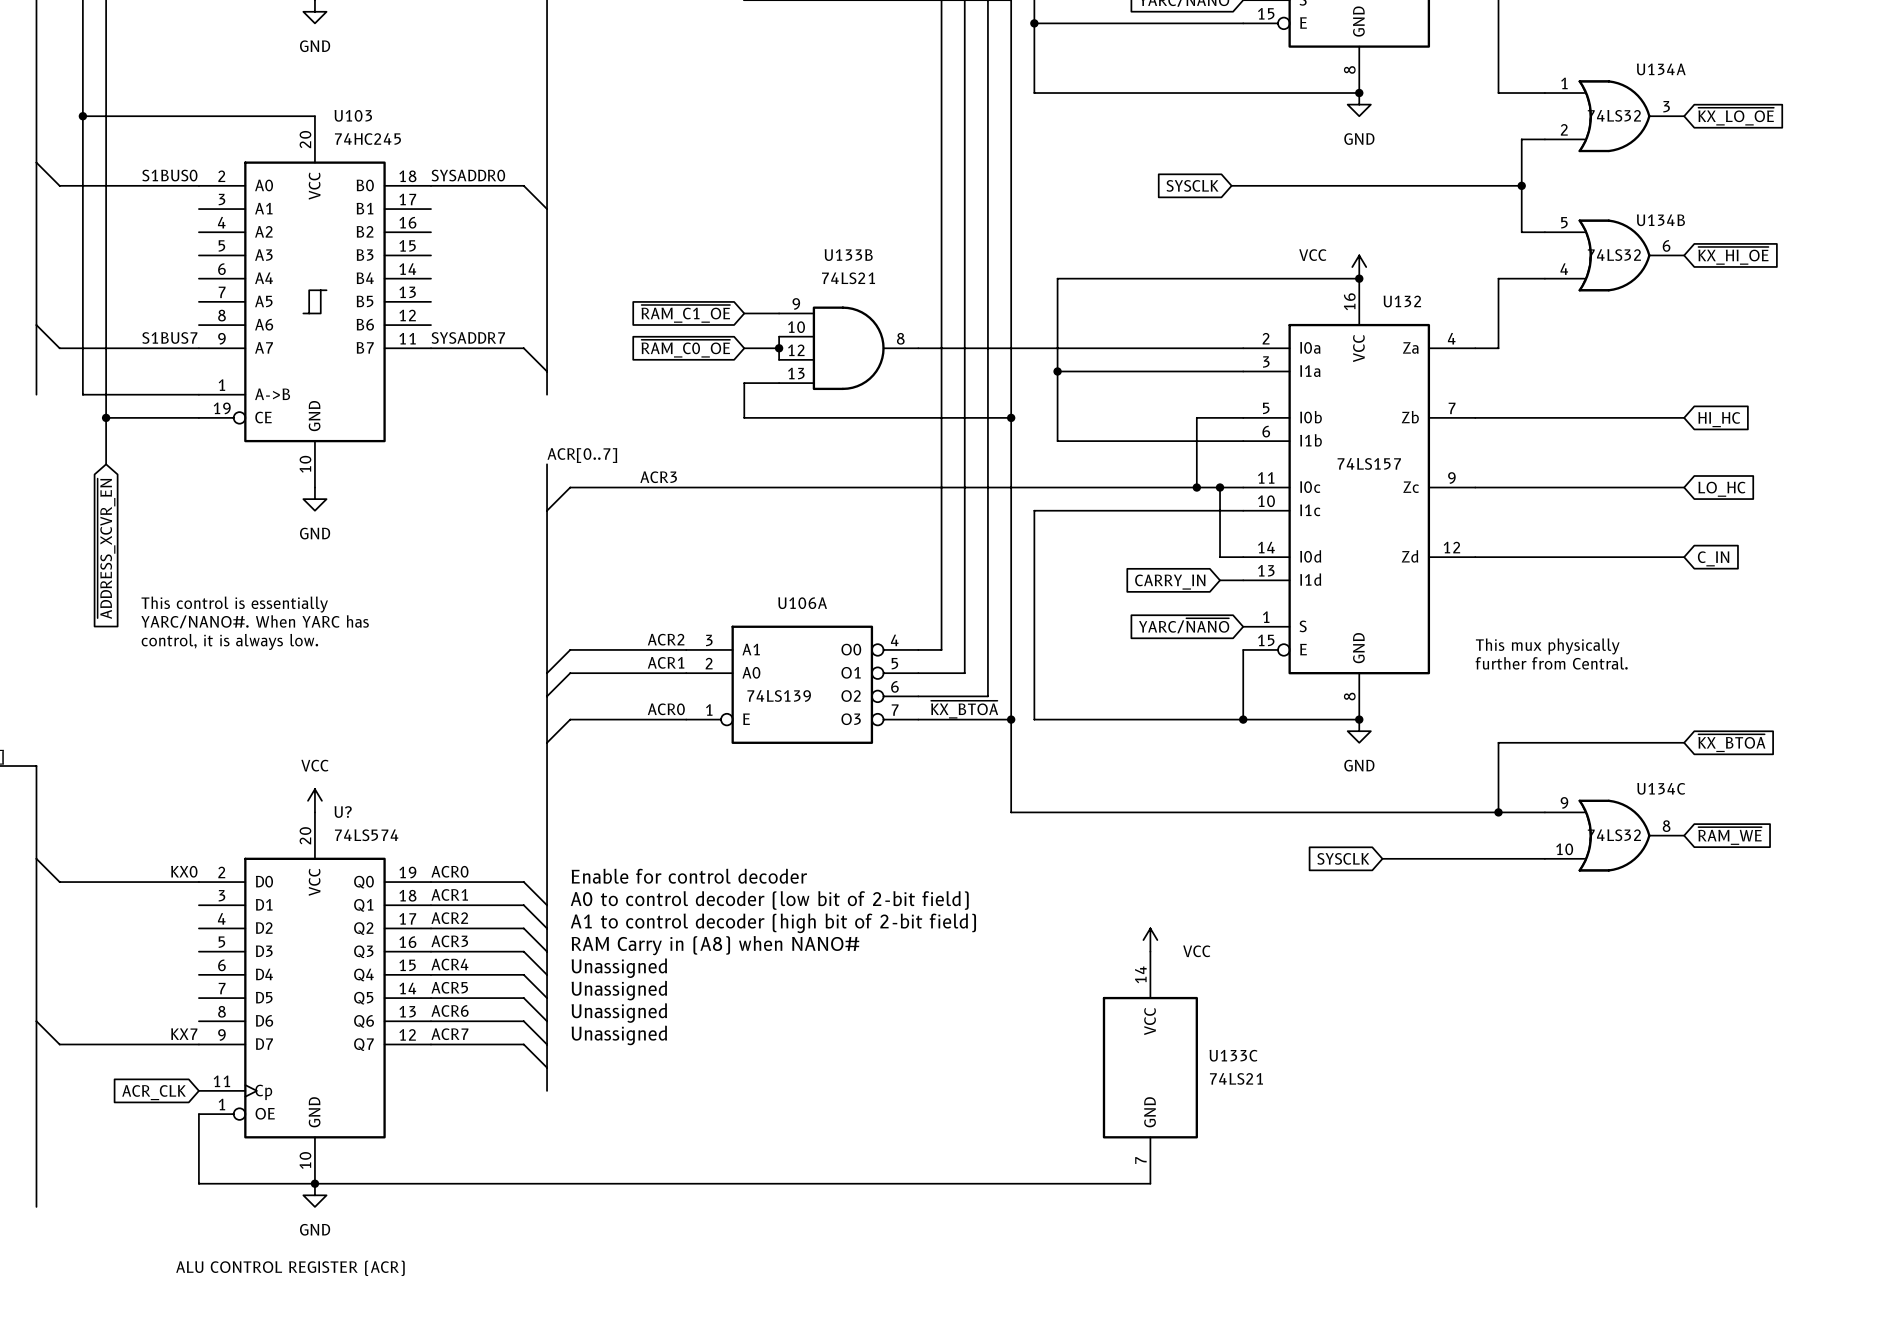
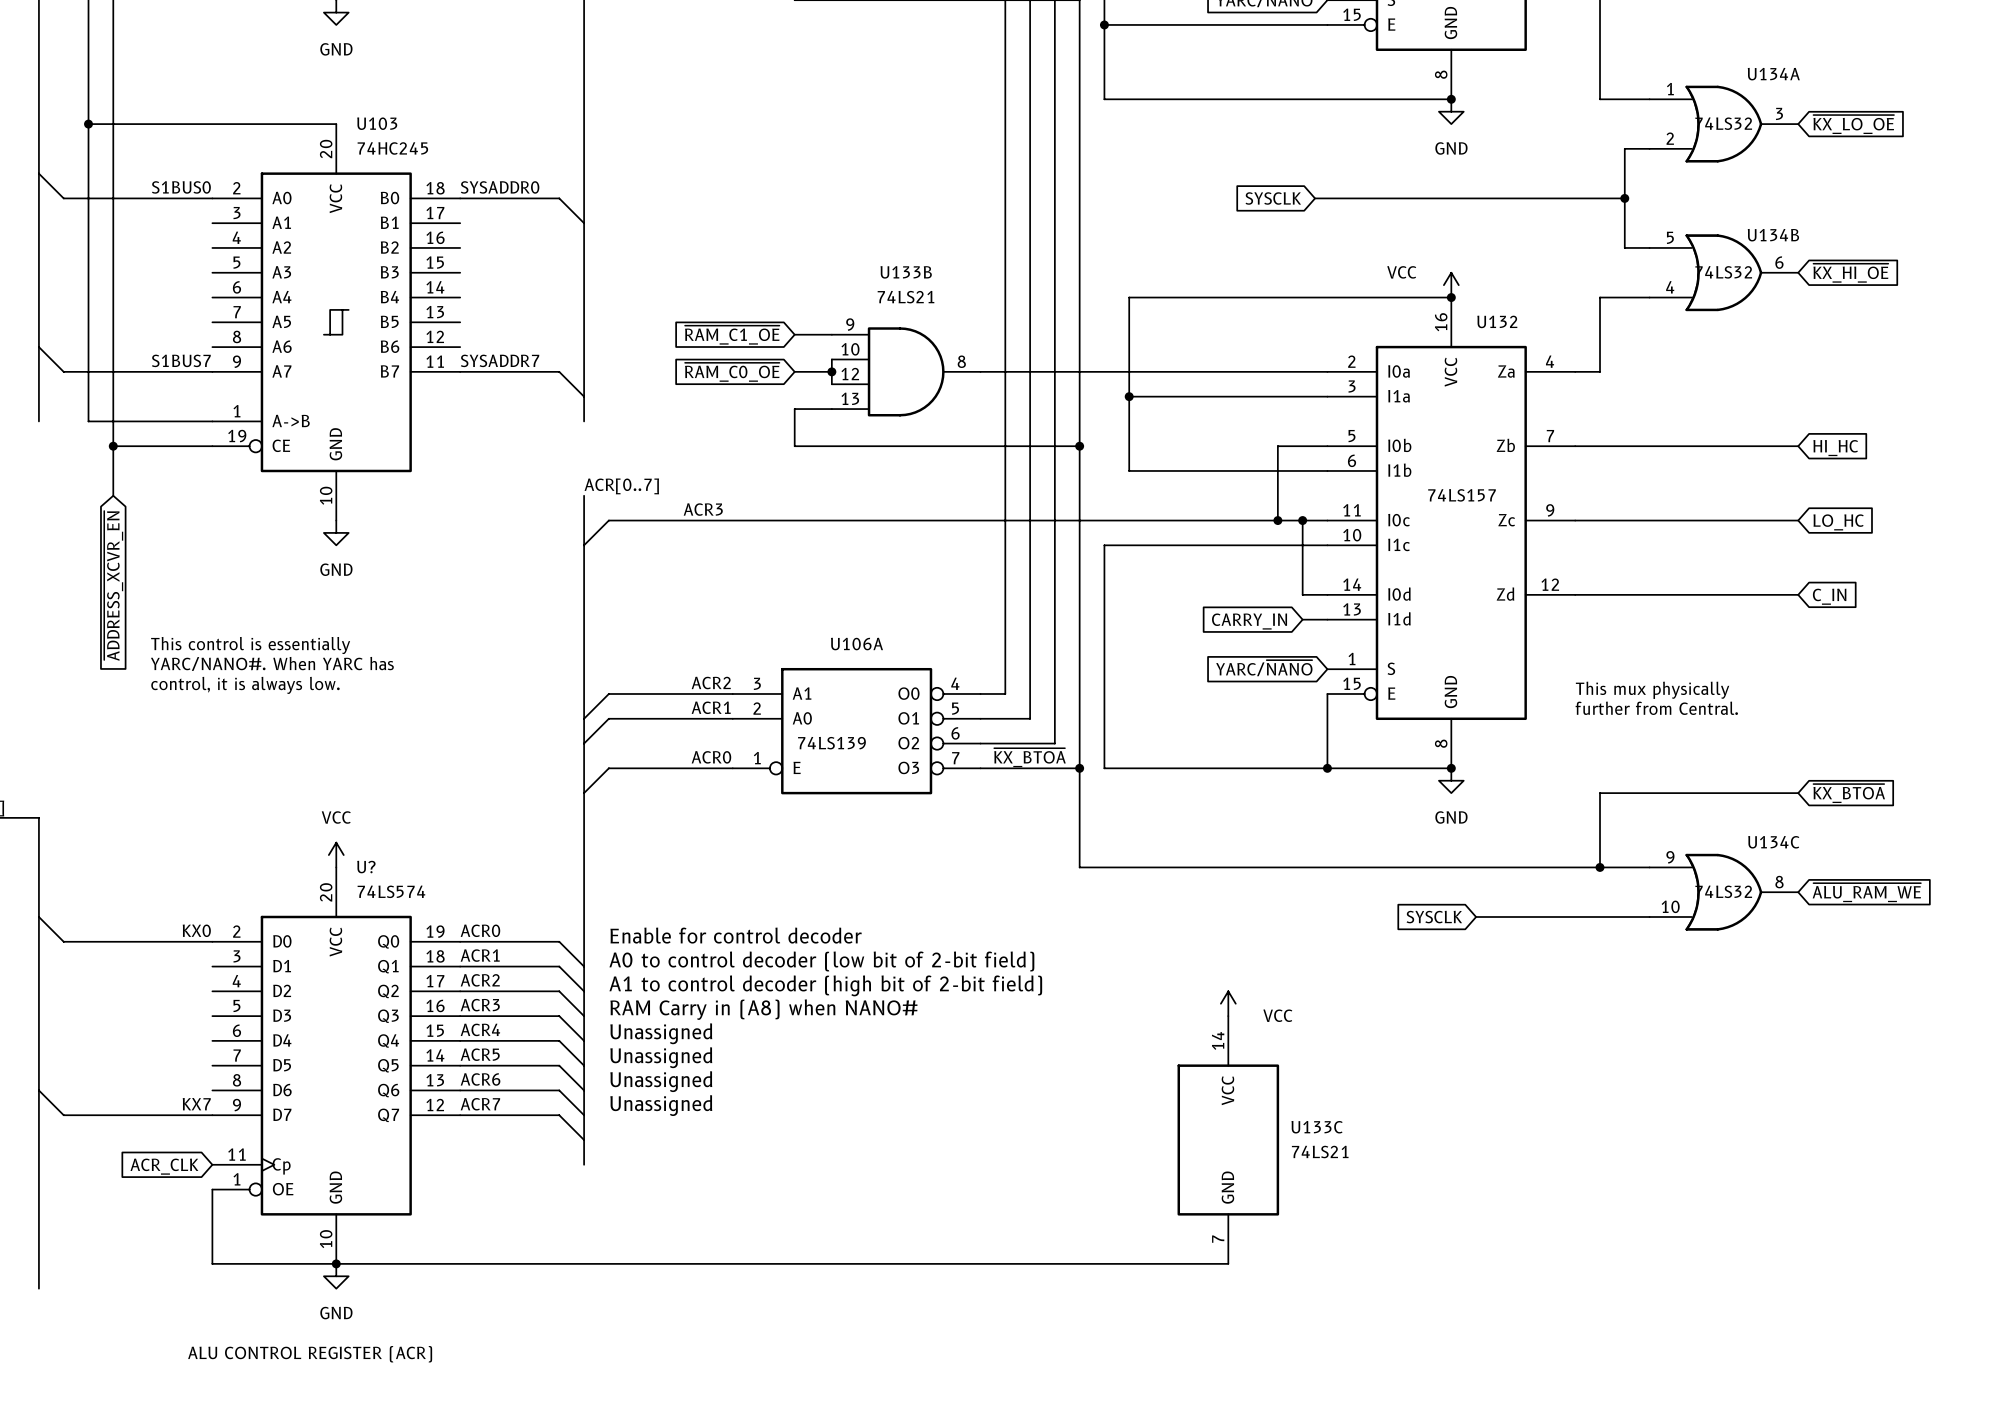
global label: ~{RAM_WE} (1730, 836) -> ~{ALU_RAM_WE} (1866, 892)

